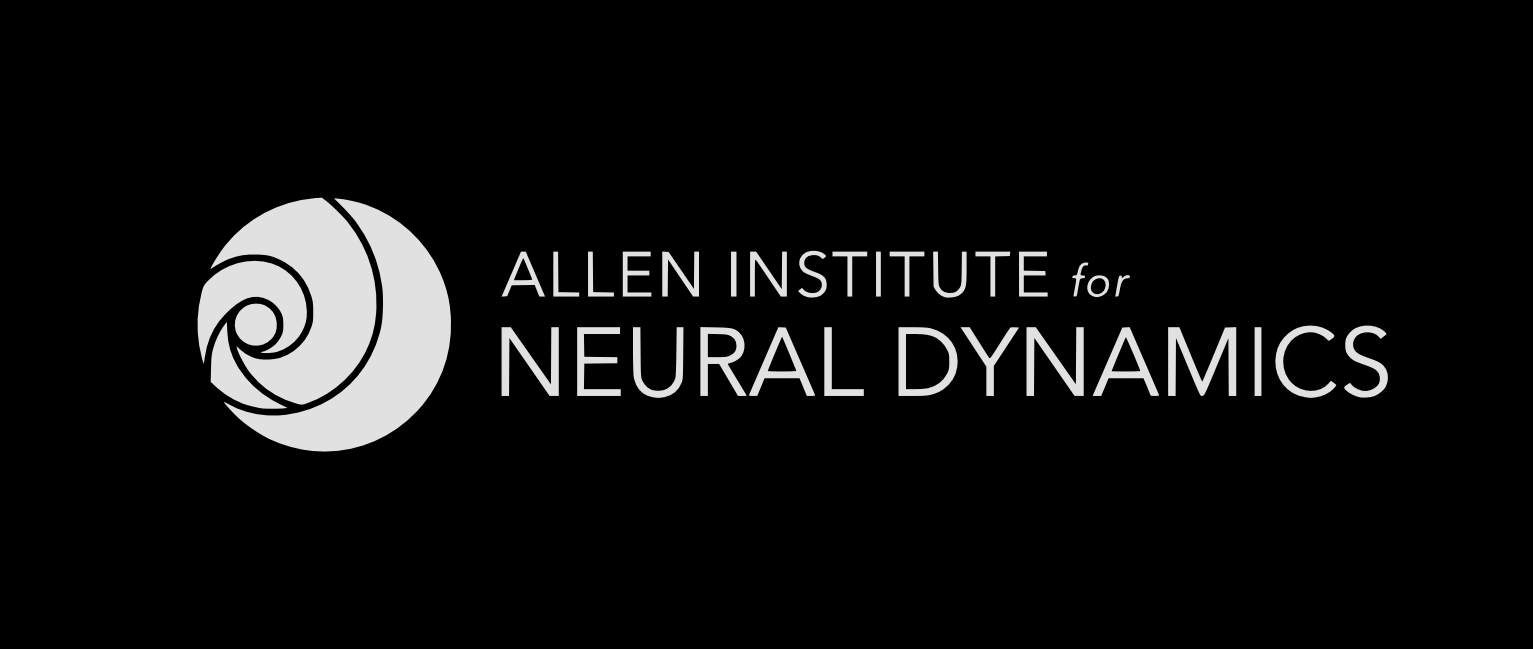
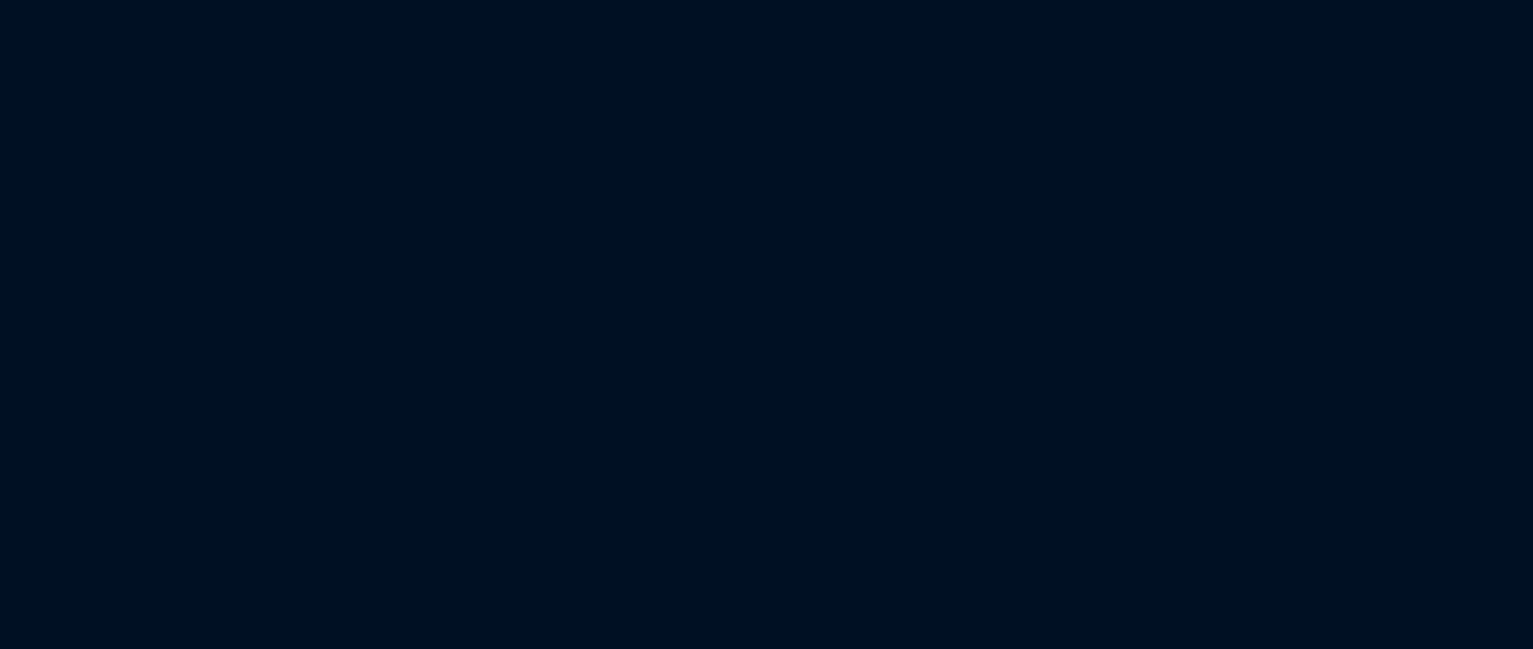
drawing: [197, 197, 1388, 452] -> none

